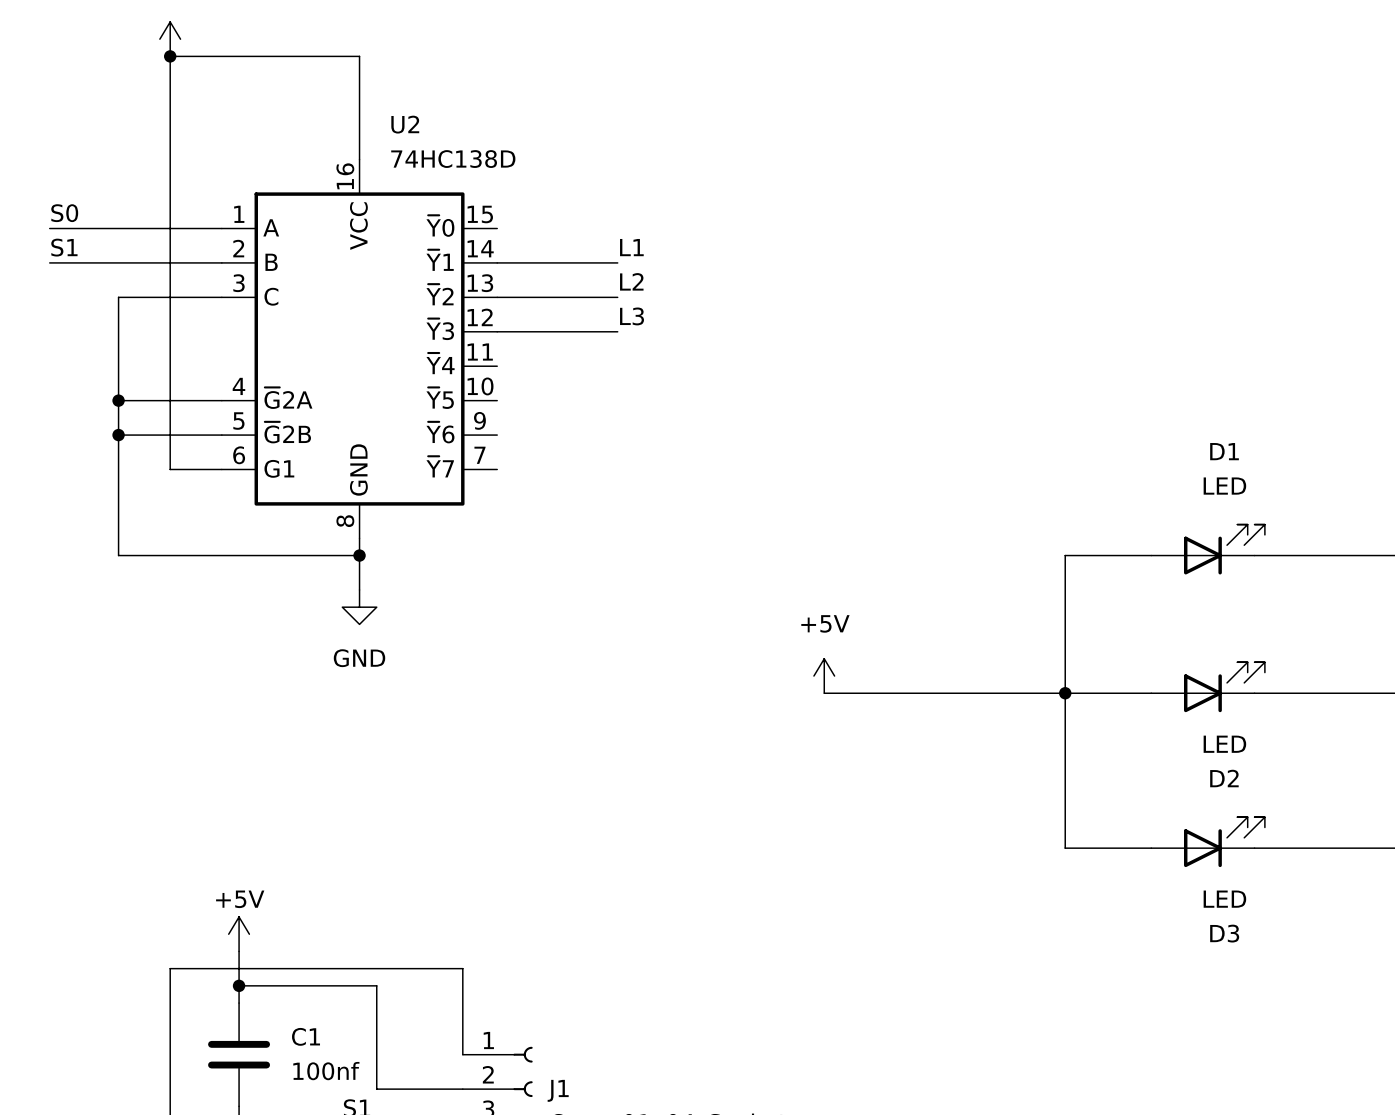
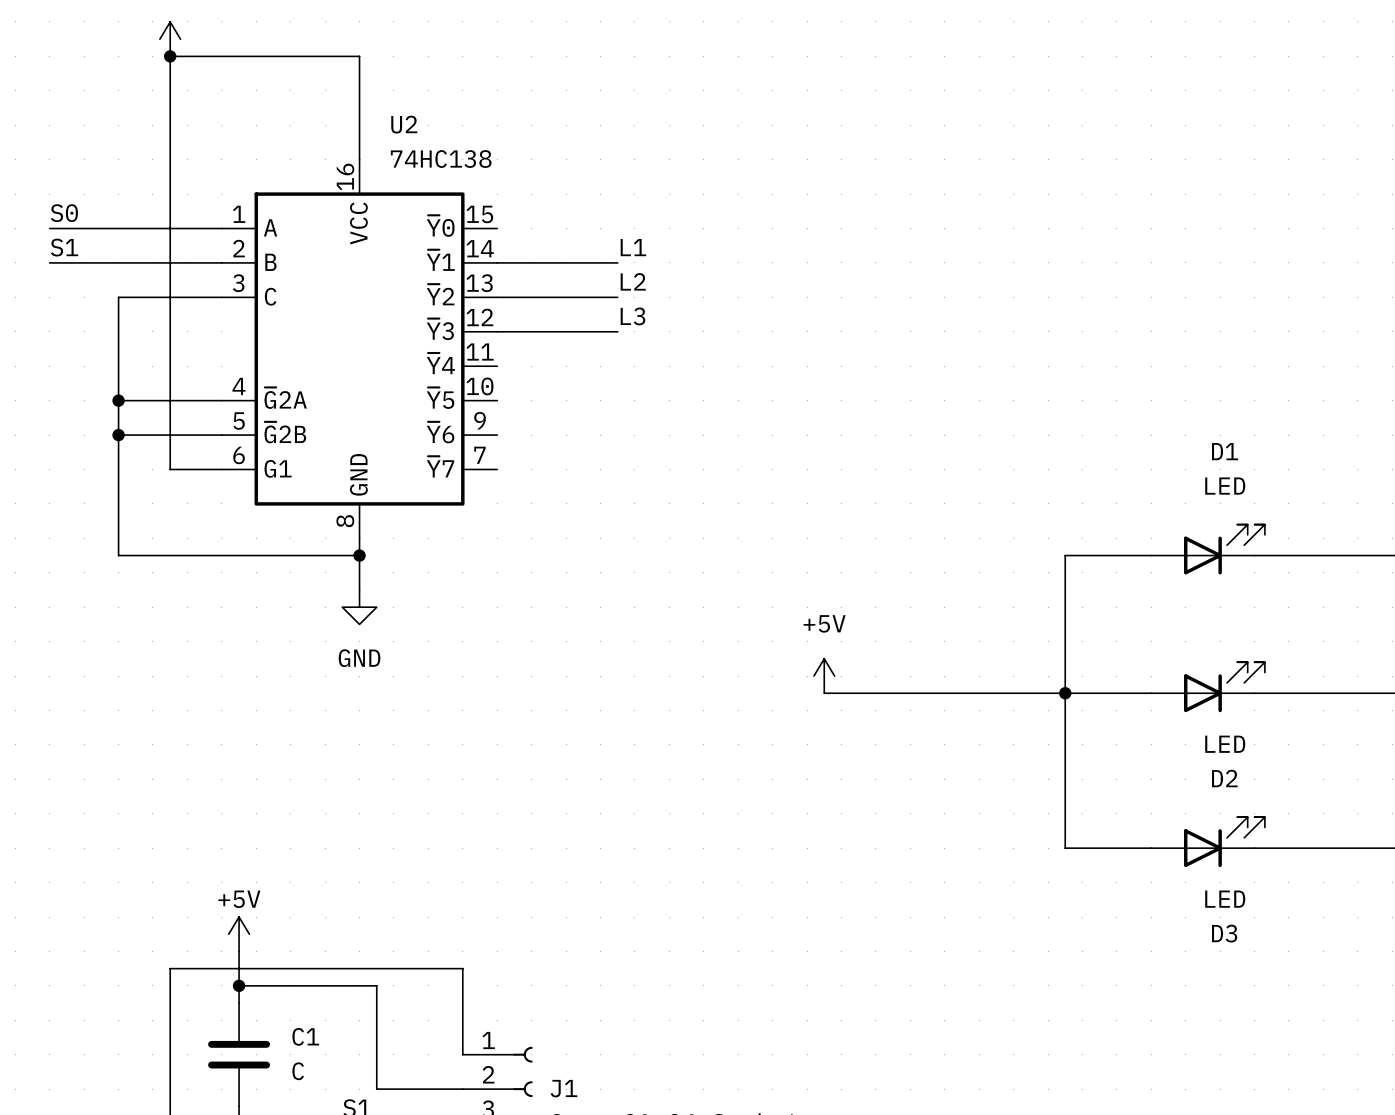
U2 value: 74HC138D (453, 159) -> 74HC138 (441, 159)
C1 value: 100nf (326, 1071) -> C (298, 1071)

